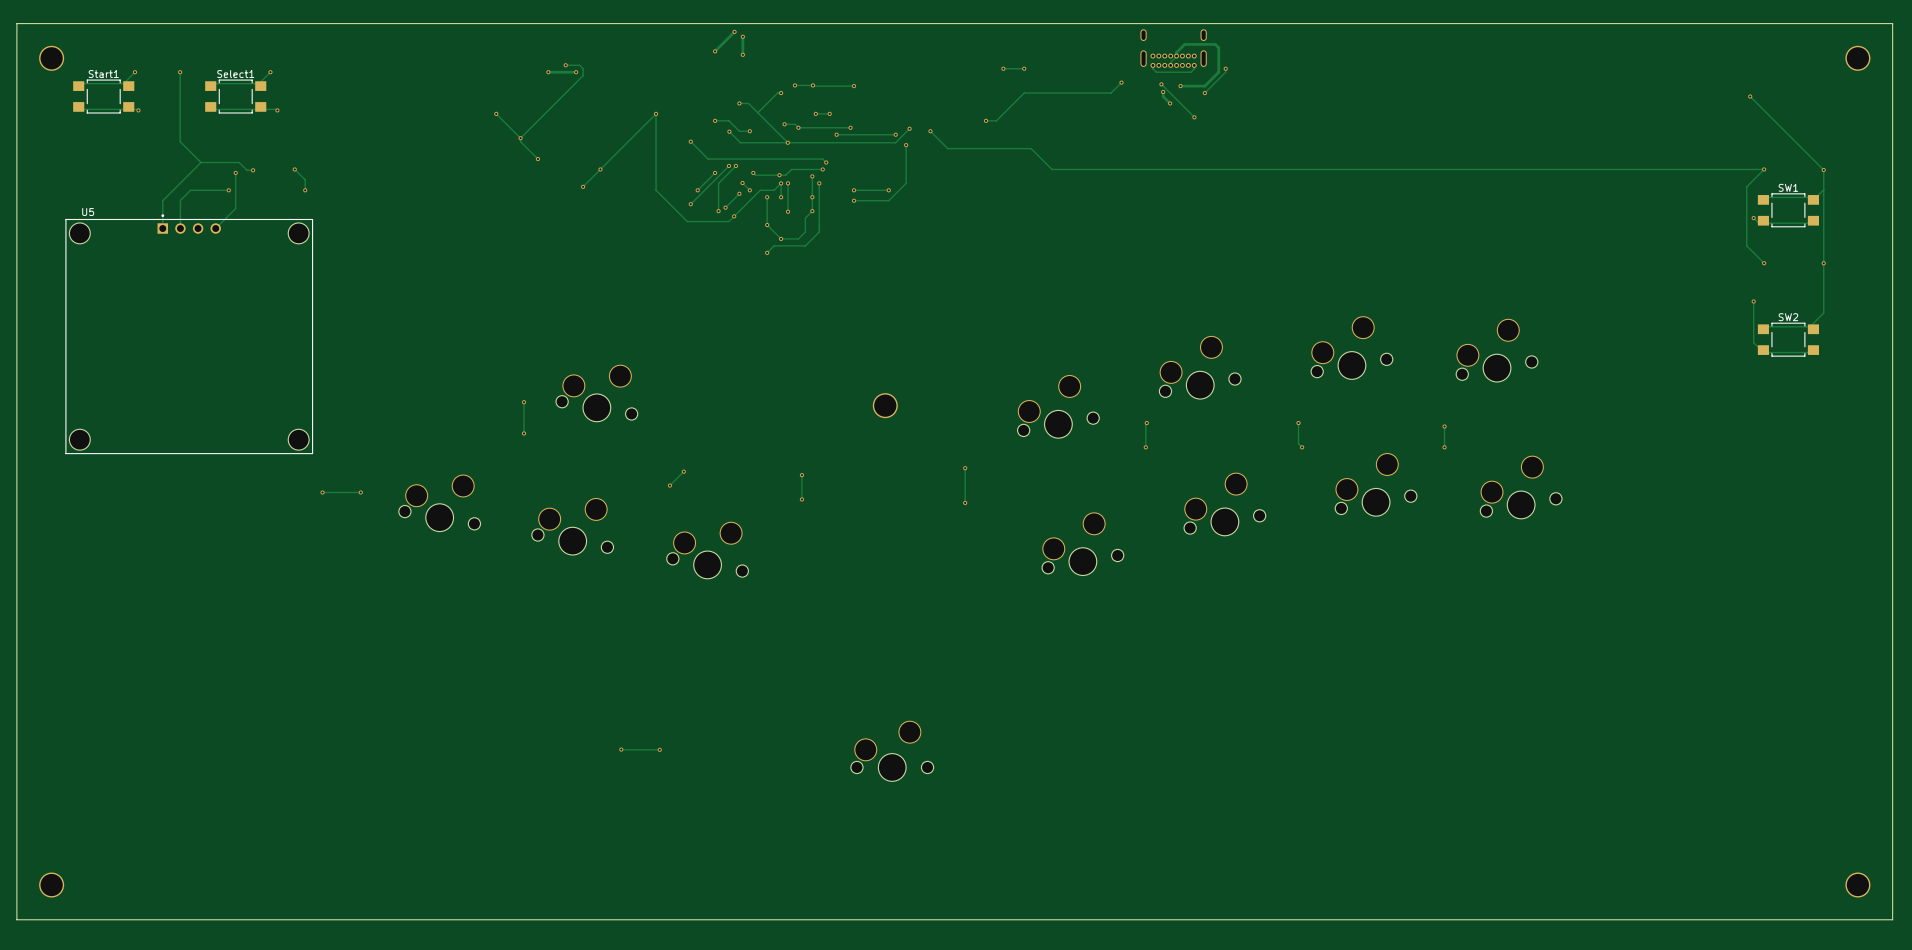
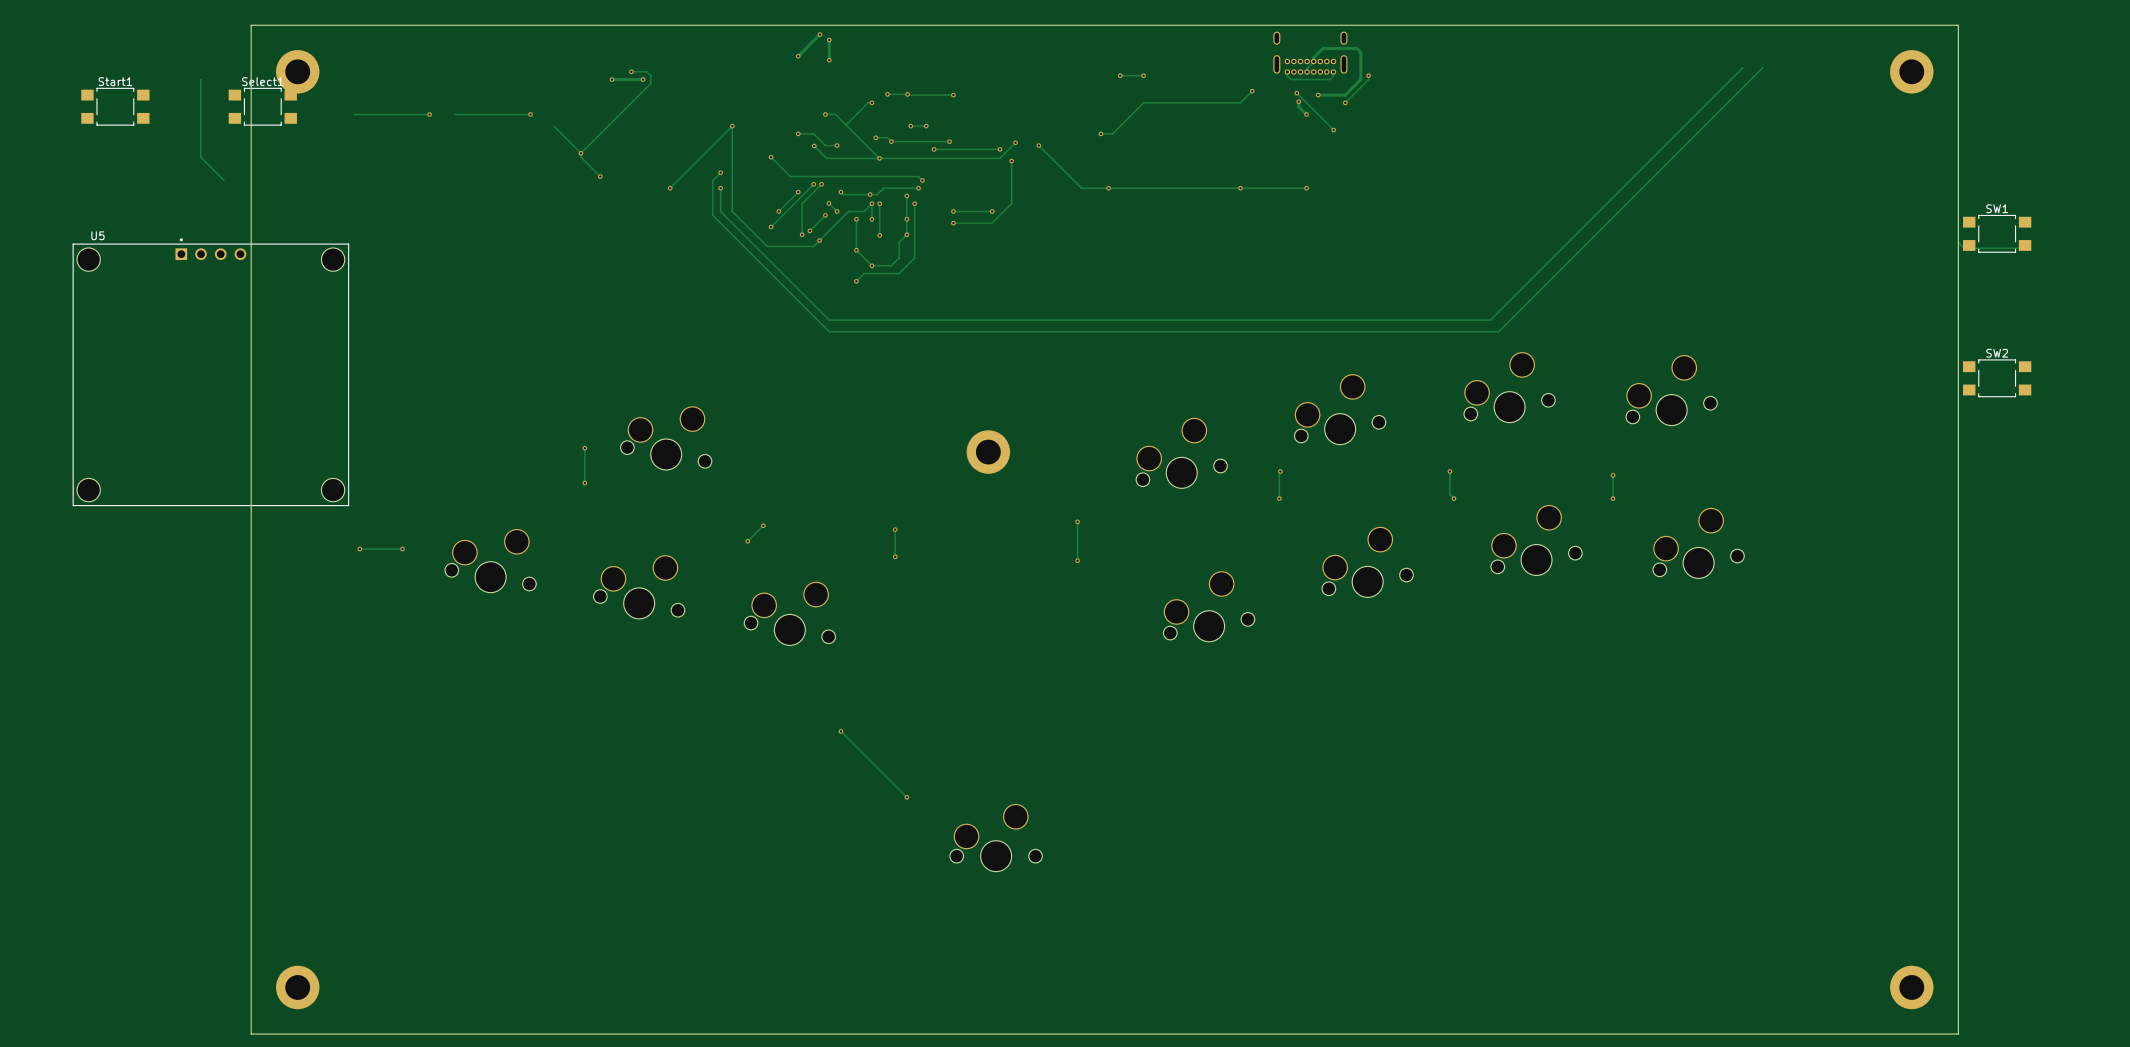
board edge: (1753, 23) (1892, 23) (1892, 919) (16, 919) (16, 23) (225, 23) -> (1958, 25) (1958, 1034) (251, 1034) (251, 25)
part: (51, 58) -> none
part: (1857, 58) -> none
track: none -> (1743, 67) (1490, 320) (829, 320) (720, 211) (720, 188)
track: none -> (1762, 67) (1498, 331) (829, 331) (712, 215) (712, 180) (720, 172)
part: none -> (297, 71)
part: none -> (1911, 71)
track: (134, 72) (125, 83) (82, 83) -> none
via: (134, 72) -> none
via: (180, 72) -> none
track: (270, 72) (259, 83) (214, 83) -> none
via: (270, 72) -> none
track: (1750, 96) (1823, 170) (1823, 313) (1809, 326) (1766, 326) -> none
via: (1750, 96) -> none
track: none -> (429, 114) (354, 114)
via: none -> (429, 114)
track: none -> (530, 114) (455, 114)
track: (82, 109) (138, 110) -> none
track: (214, 109) (277, 110) -> none
via: (138, 110) -> none
via: (277, 110) -> none
via position: (496, 113) -> (530, 114)
track: (947, 148) (1031, 148) (1052, 169) -> (1058, 164) (1081, 188) (1174, 188)
via: none -> (720, 172)
track: (294, 169) (305, 179) (305, 190) -> none
via: (294, 169) -> none
track: (600, 169) (583, 186) -> none
via: none -> (720, 188)
via: none -> (1108, 188)
via: none -> (1240, 188)
track: (1170, 169) (1764, 169) (1746, 186) (1746, 245) (1764, 263) -> none
via: none -> (1306, 188)
via: (1764, 169) -> none
track: (253, 170) (246, 170) (239, 162) (200, 162) (162, 200) (162, 228) -> none
via: (253, 170) -> none
via: (1823, 170) -> none
track: (235, 172) (235, 208) (215, 228) -> none
via: (235, 172) -> none
via: (583, 186) -> none
track: (1823, 189) (1816, 197) (1766, 197) -> none
track: (228, 190) (190, 190) (180, 200) (180, 228) -> none
via: (228, 190) -> none
via: (305, 190) -> none
via: (1753, 218) -> none
via: (1764, 263) -> none
via: (1823, 263) -> none
track: (1753, 301) (1753, 342) (1763, 352) (1809, 352) -> none
via: (1753, 301) -> none
part footprint: [872, 393, 898, 419] -> [966, 430, 1011, 474]
track: none -> (840, 731) (906, 797)
via: none -> (840, 731)
via: none -> (906, 797)
track: (621, 749) (659, 749) -> none
via: (621, 749) -> none
via: (659, 749) -> none
part: (51, 885) -> none
part: none -> (297, 987)
part: none -> (1911, 987)
part: (1857, 885) -> none

